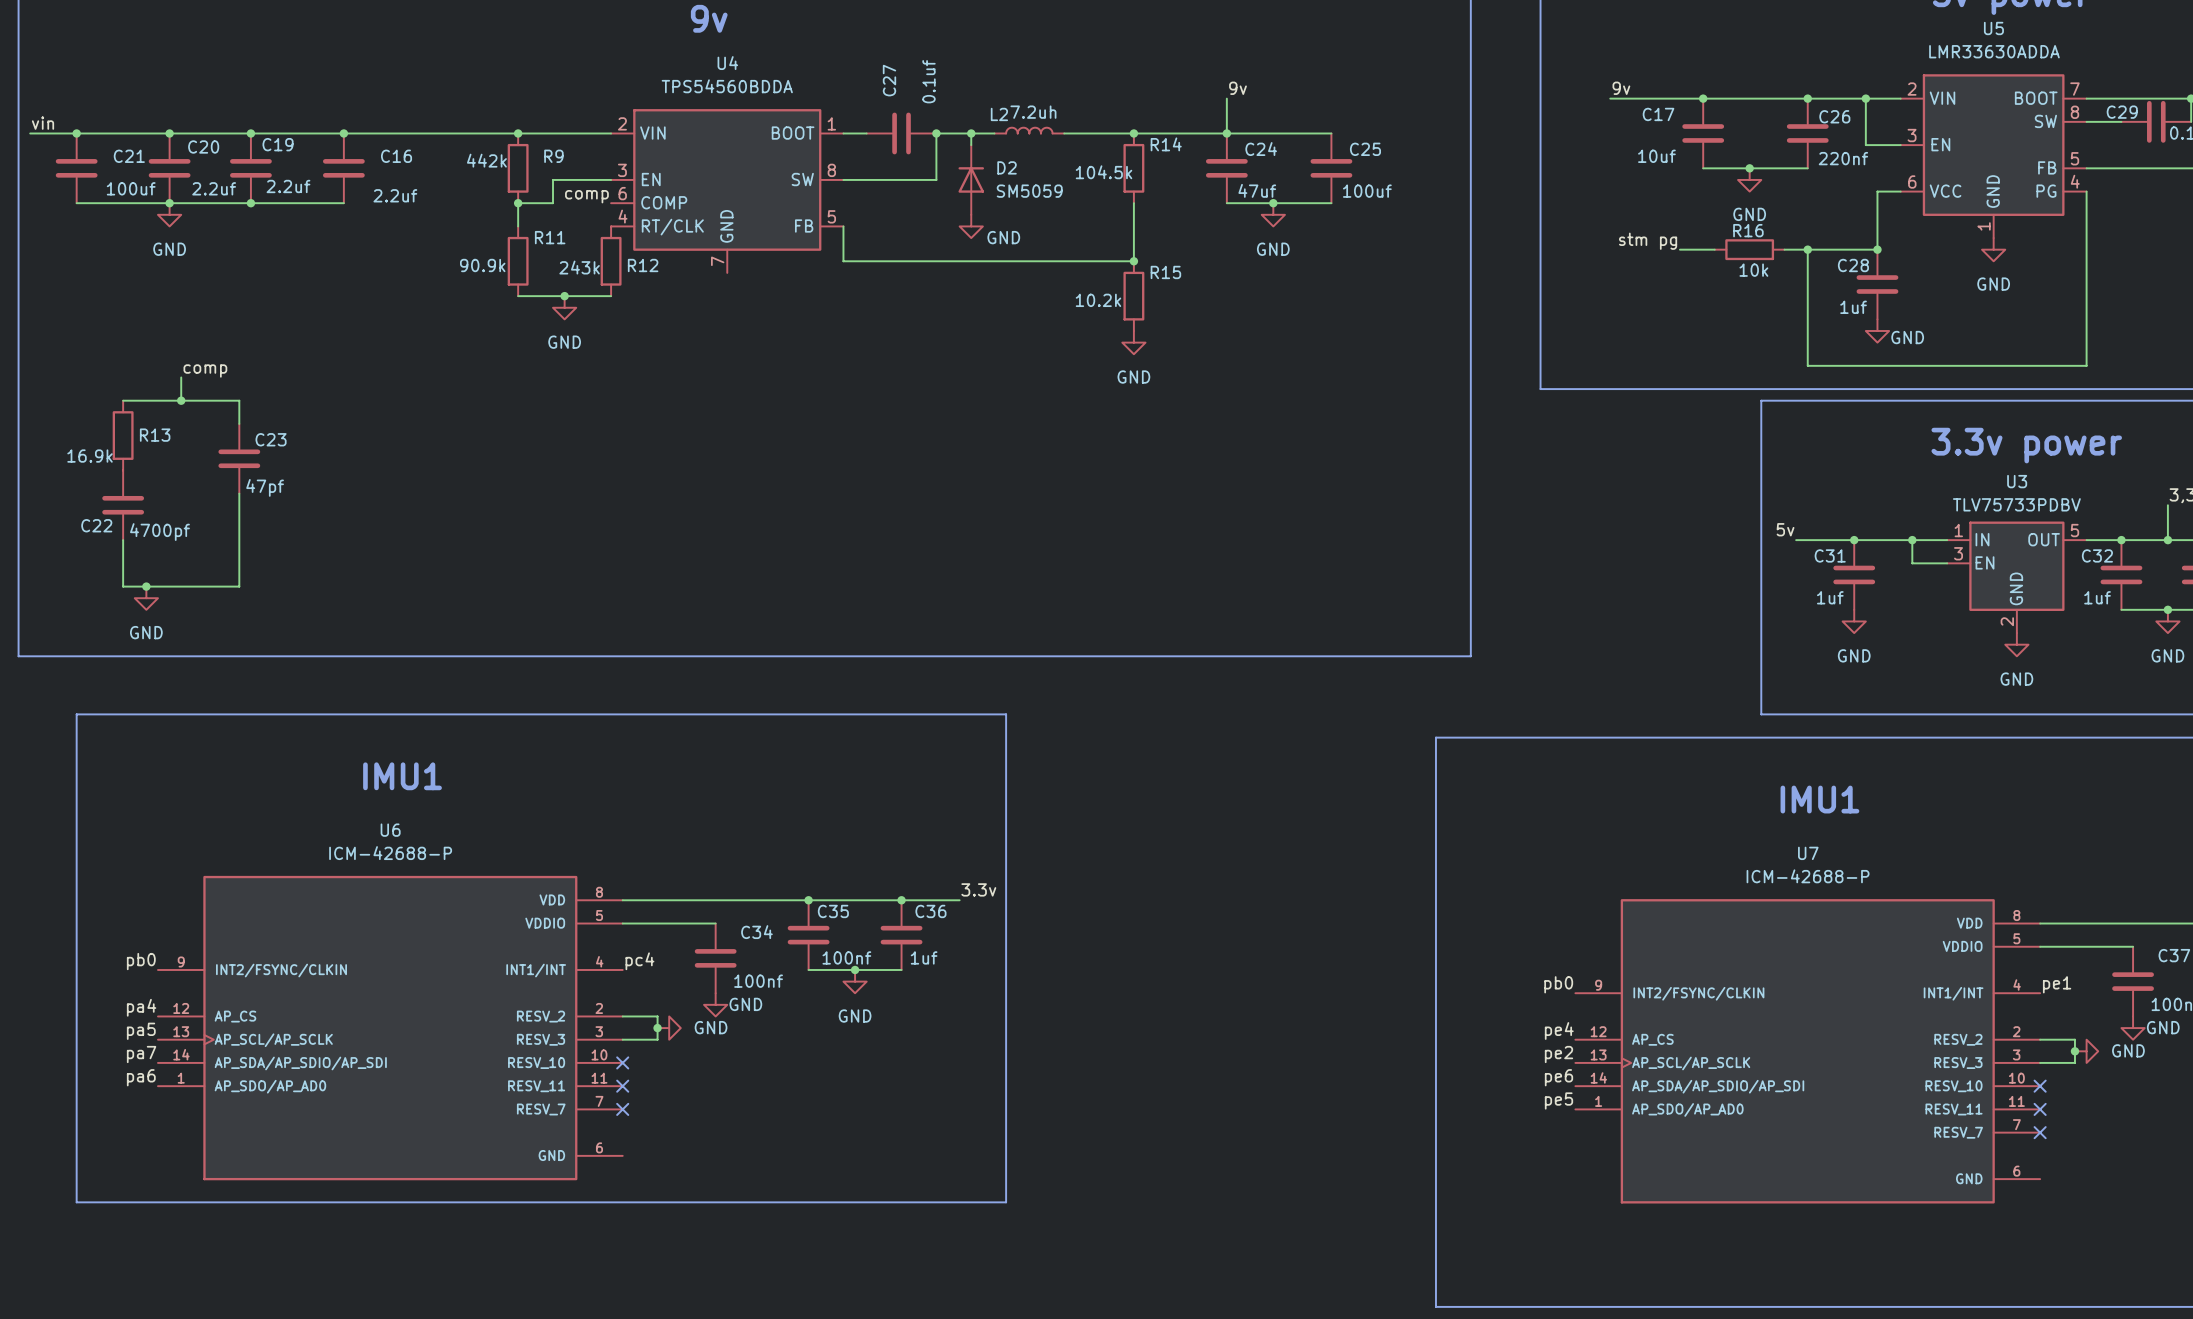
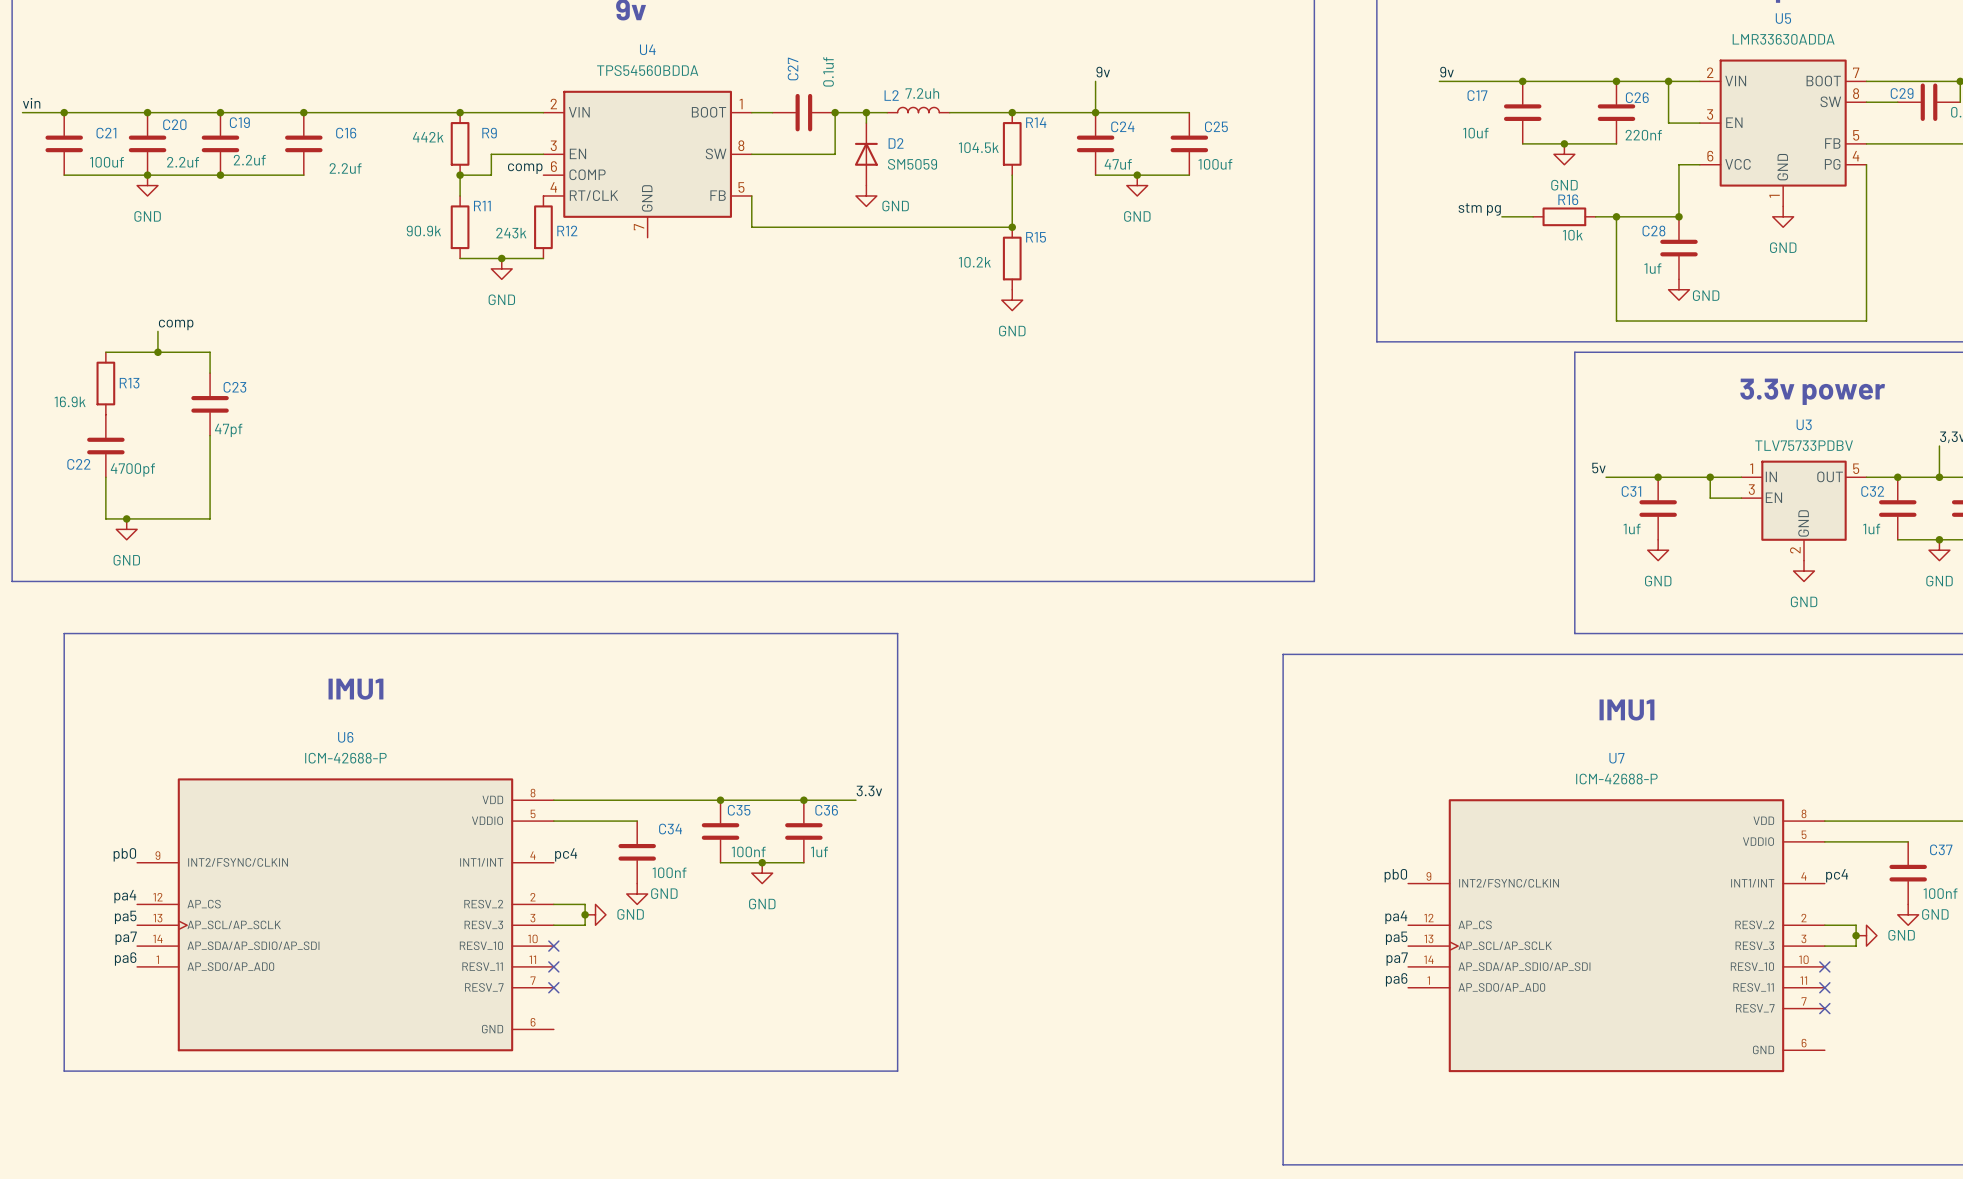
label: pe1 (2057, 984) -> pc4 (1837, 875)
label: pe4 (1559, 1030) -> pa4 (1396, 917)
label: pe2 (1558, 1054) -> pa5 (1396, 938)
label: pe6 (1558, 1077) -> pa7 (1397, 959)
label: pe5 (1558, 1100) -> pa6 (1396, 979)

